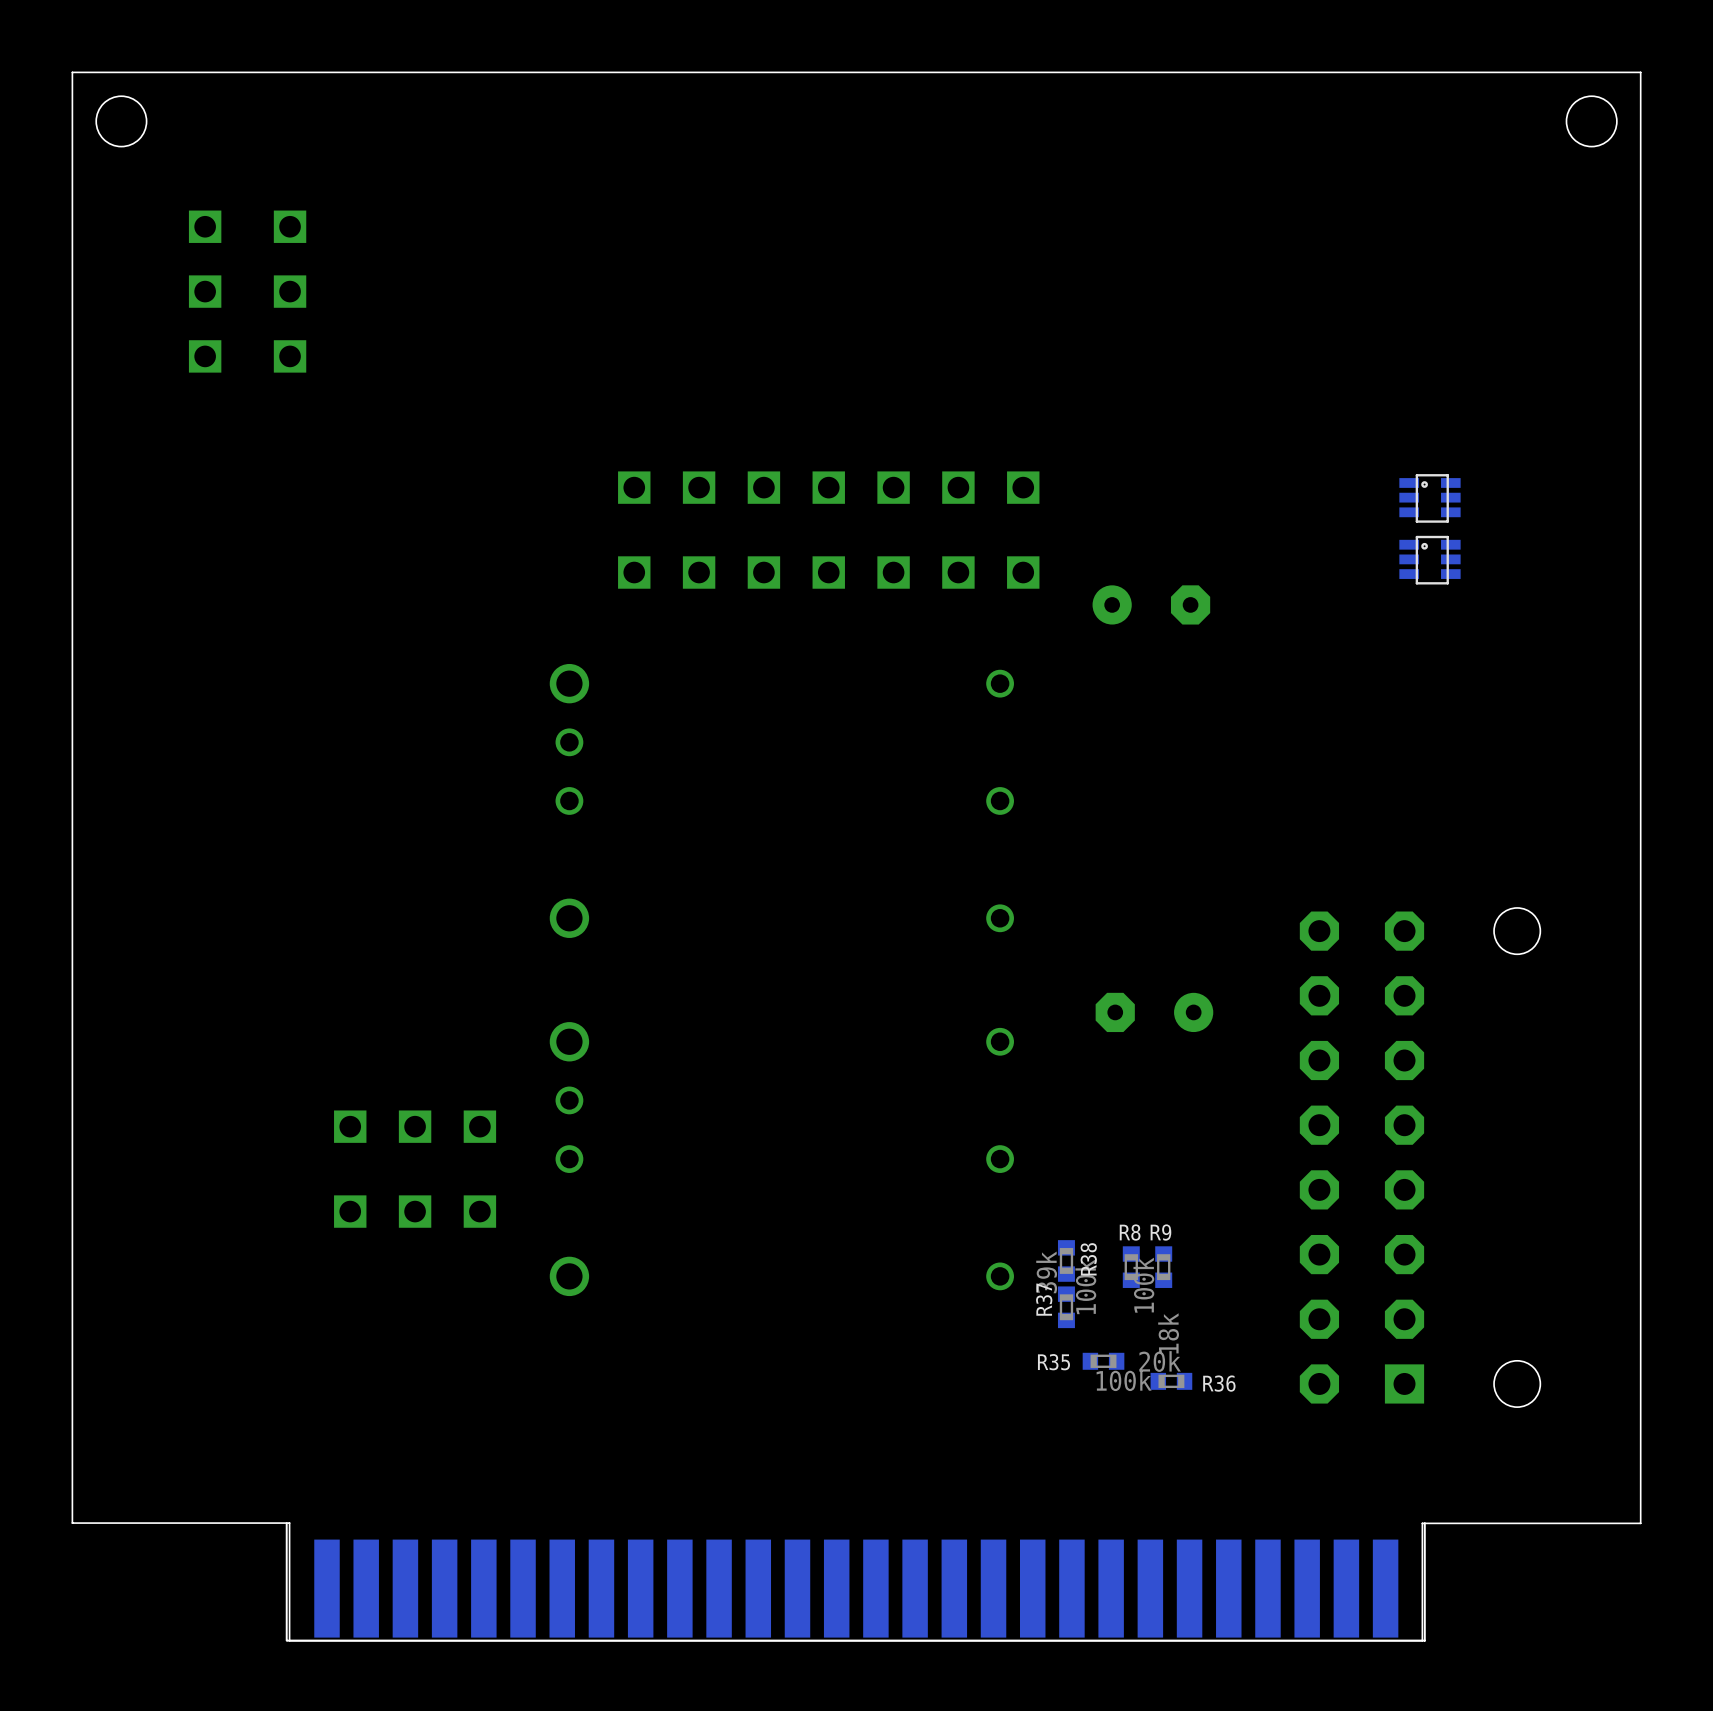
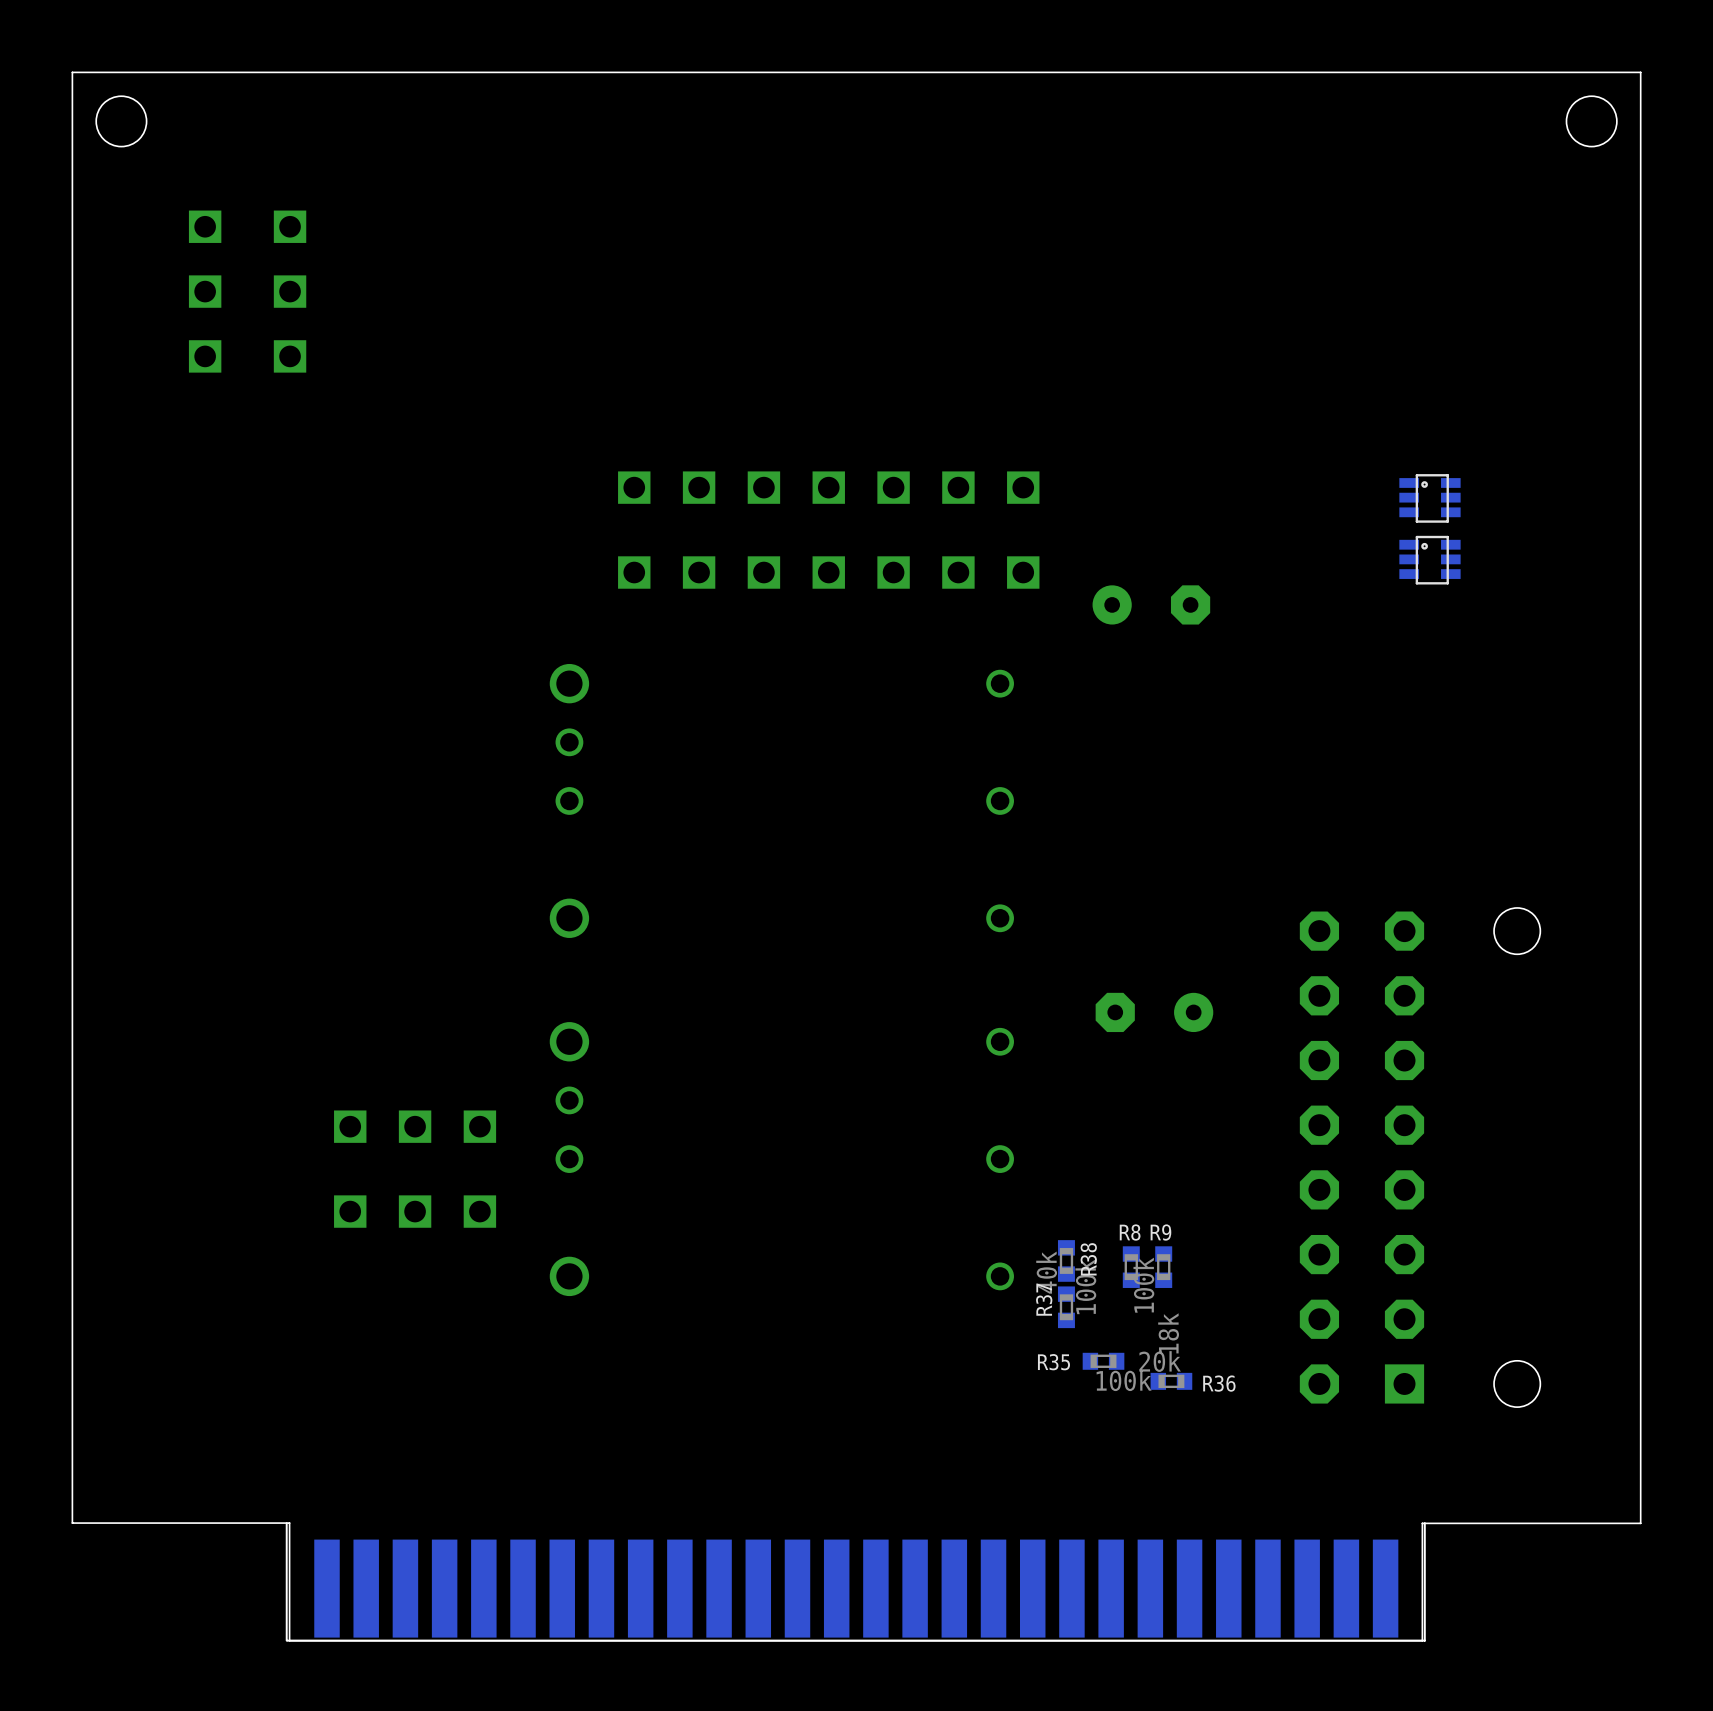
R38 value: 39k (1046, 1272) -> 40k (1046, 1272)

